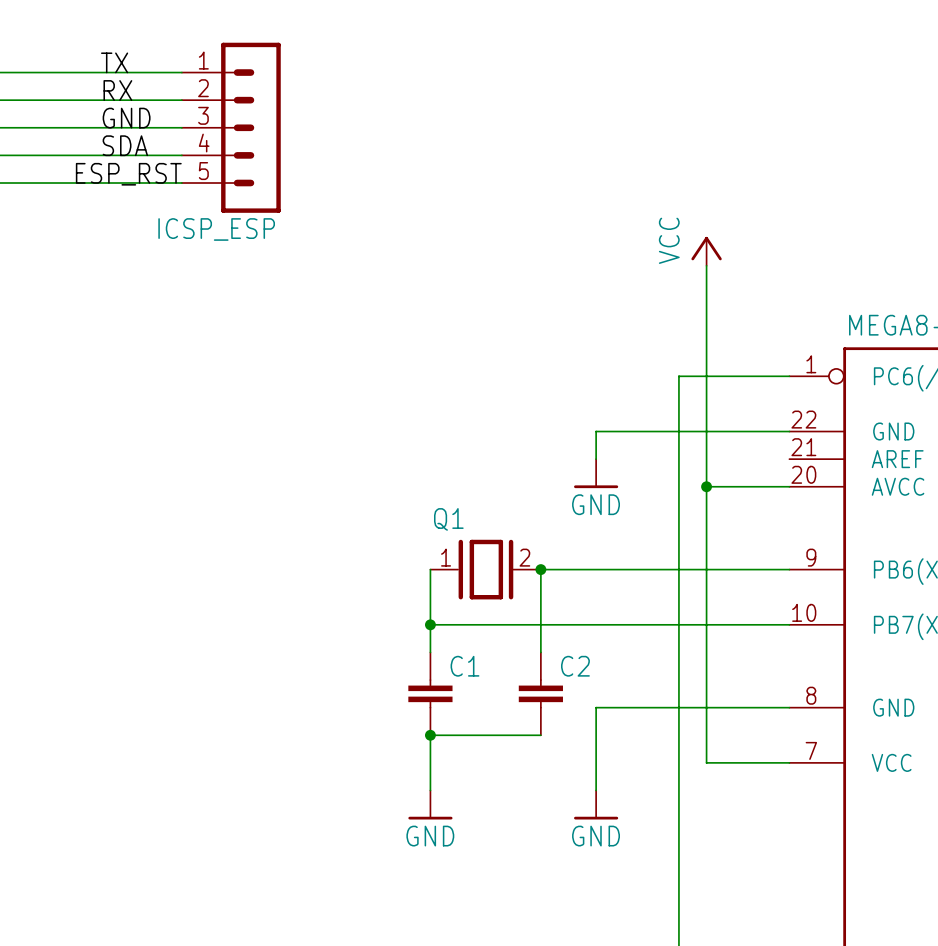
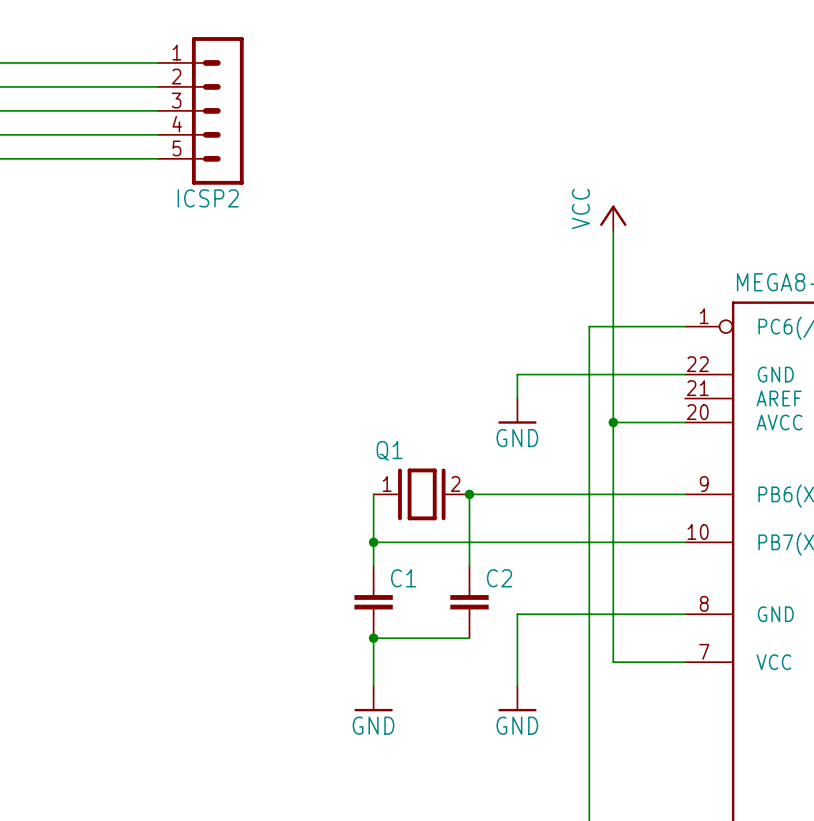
label: TX (114, 62) -> none
label: RX (117, 90) -> none
label: GND (126, 118) -> none
label: SDA (125, 145) -> none
label: ESP_RST (128, 174) -> none
ICSP_ESP name: ICSP_ESP (216, 229) -> ICSP2 (208, 198)

